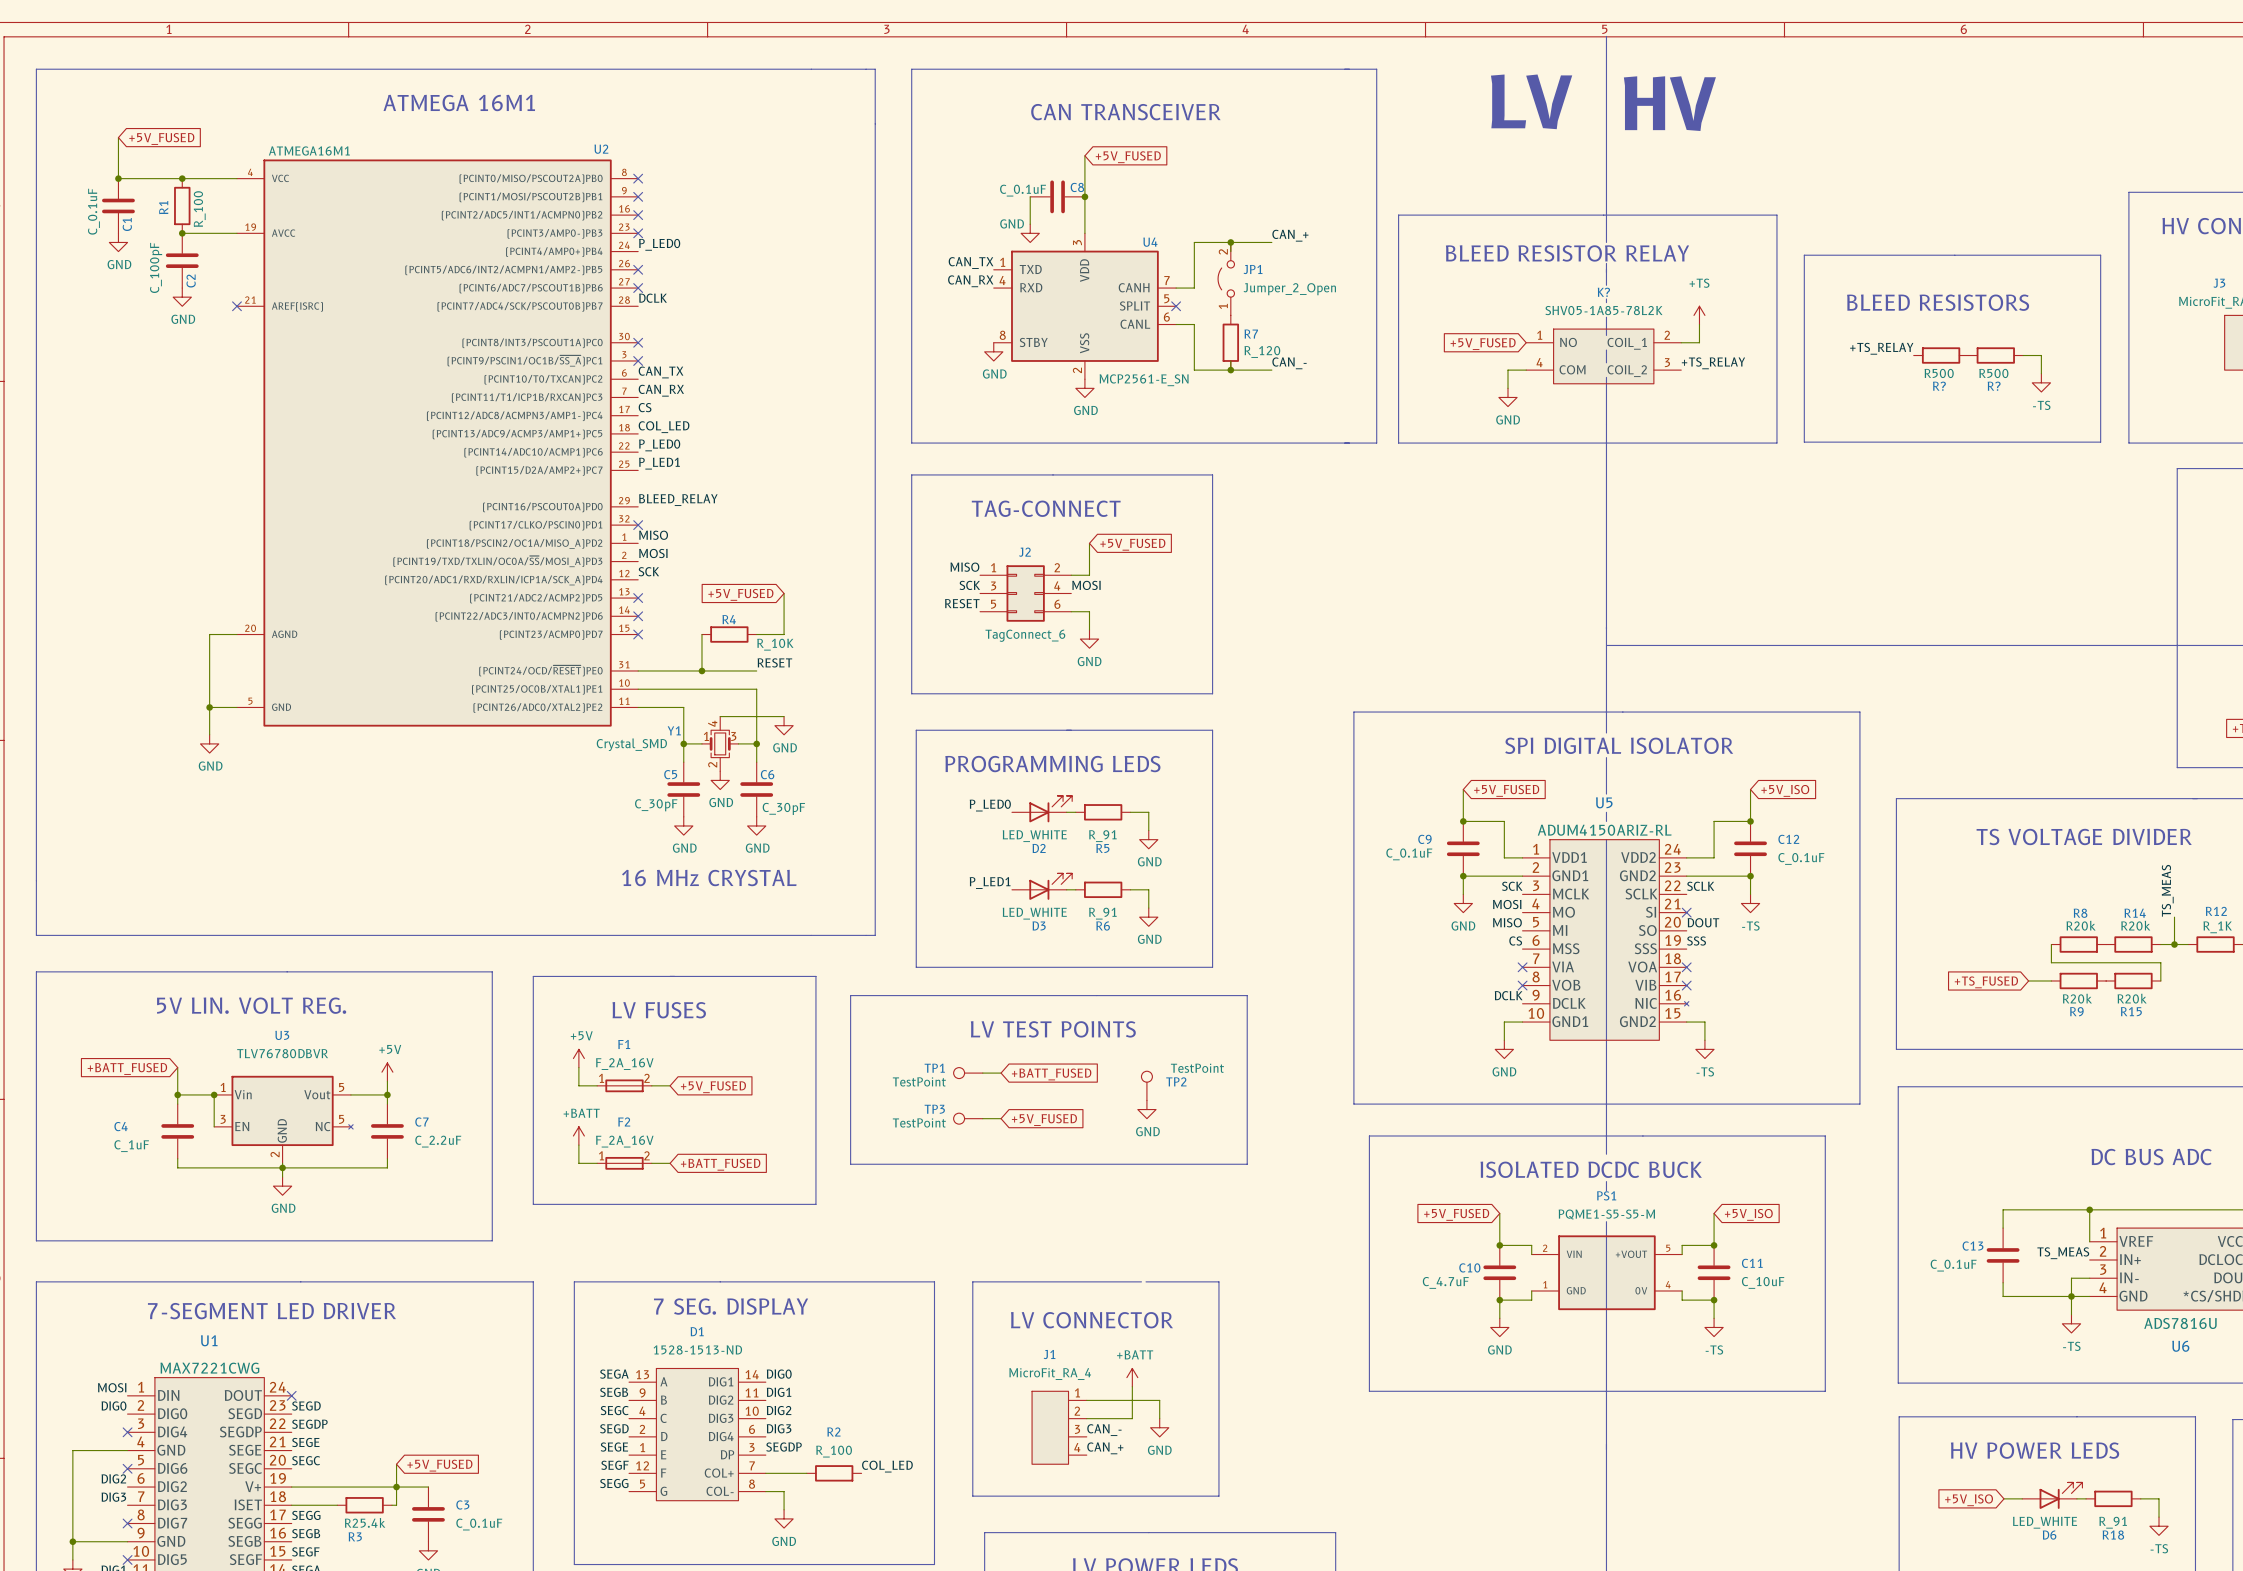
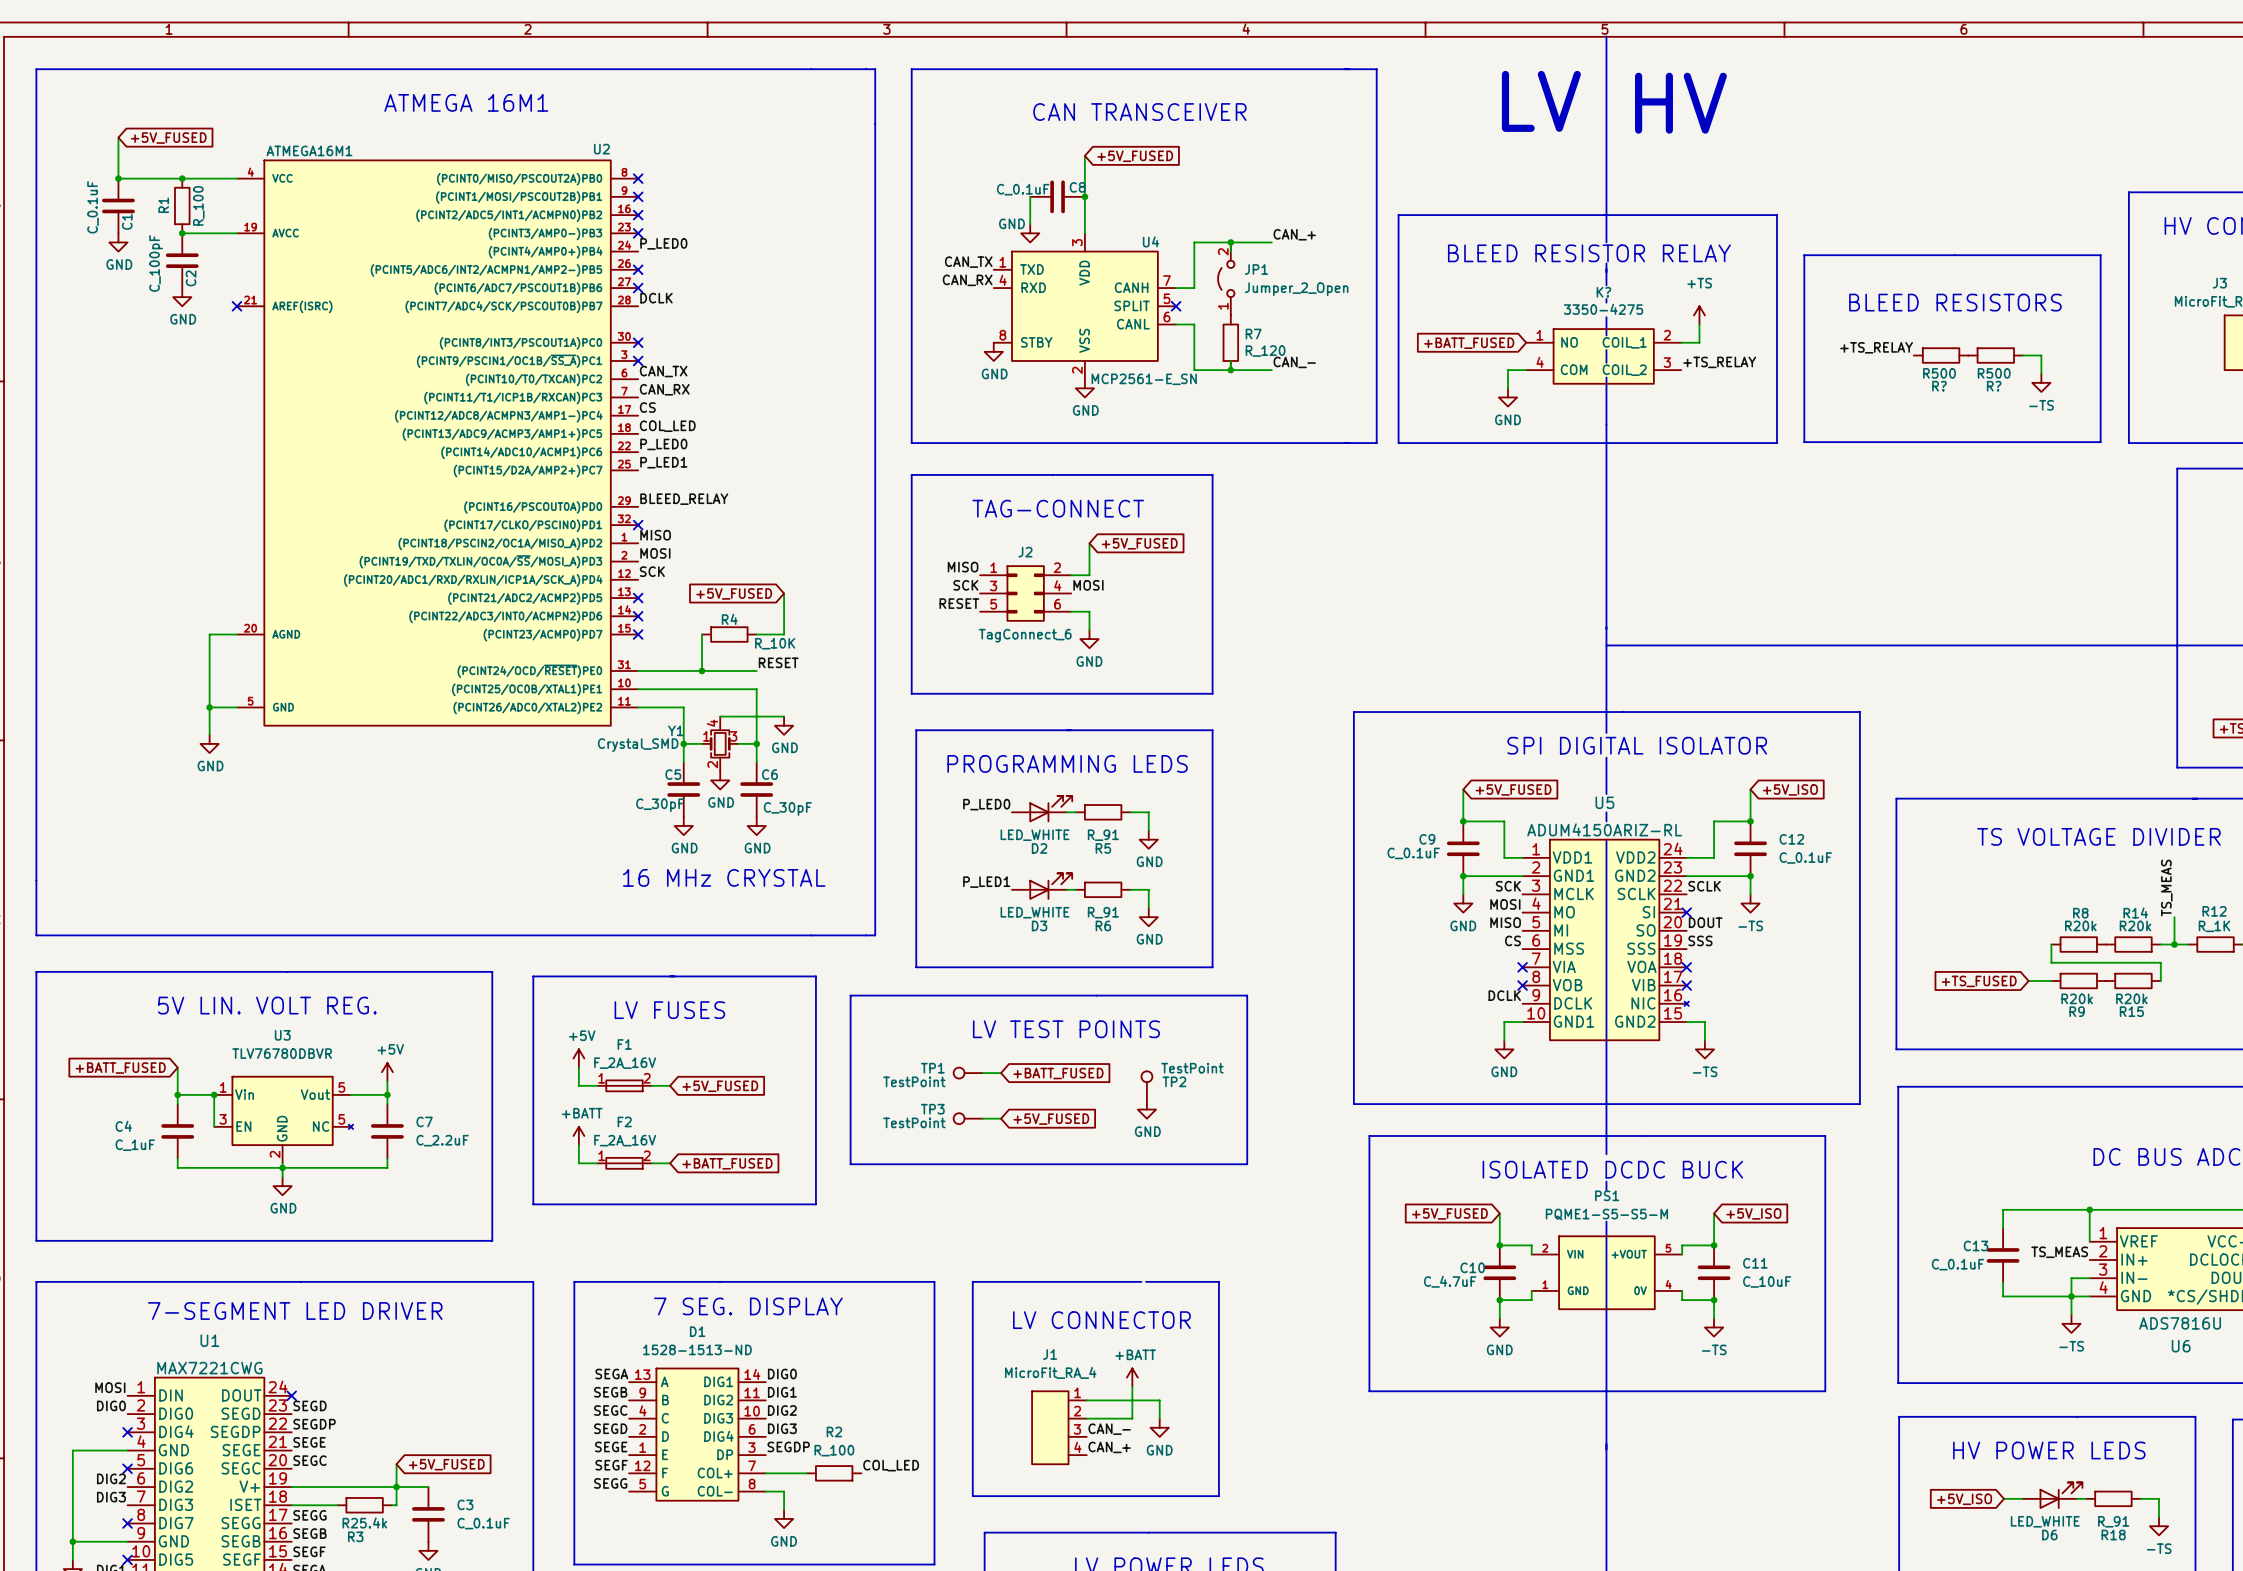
K? value: SHV05-1A85-78L2K (1603, 310) -> 3350-4275 (1603, 309)
global label: +5V_FUSED (1483, 344) -> +BATT_FUSED (1469, 343)

